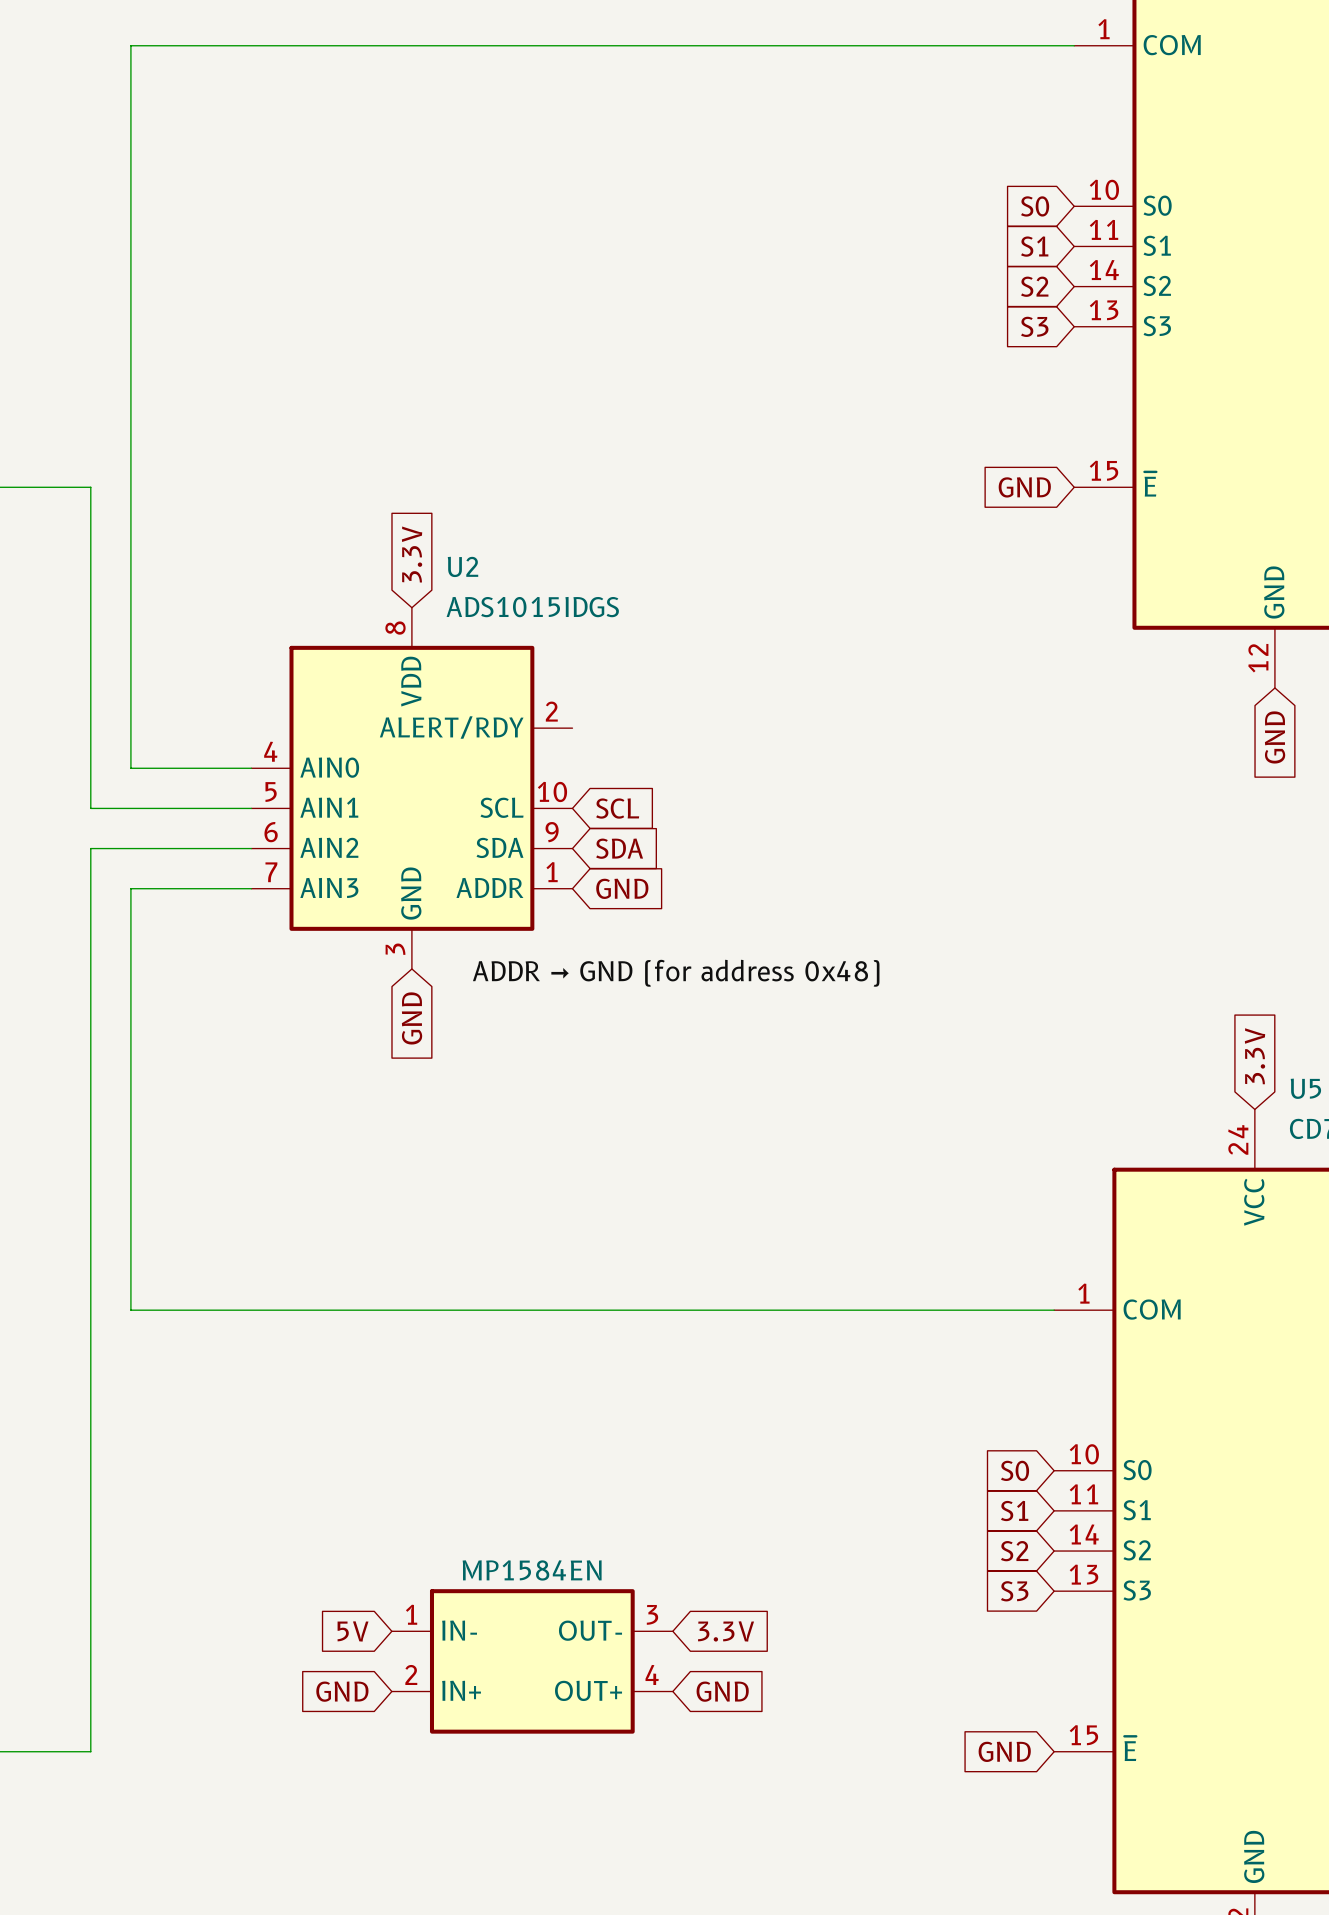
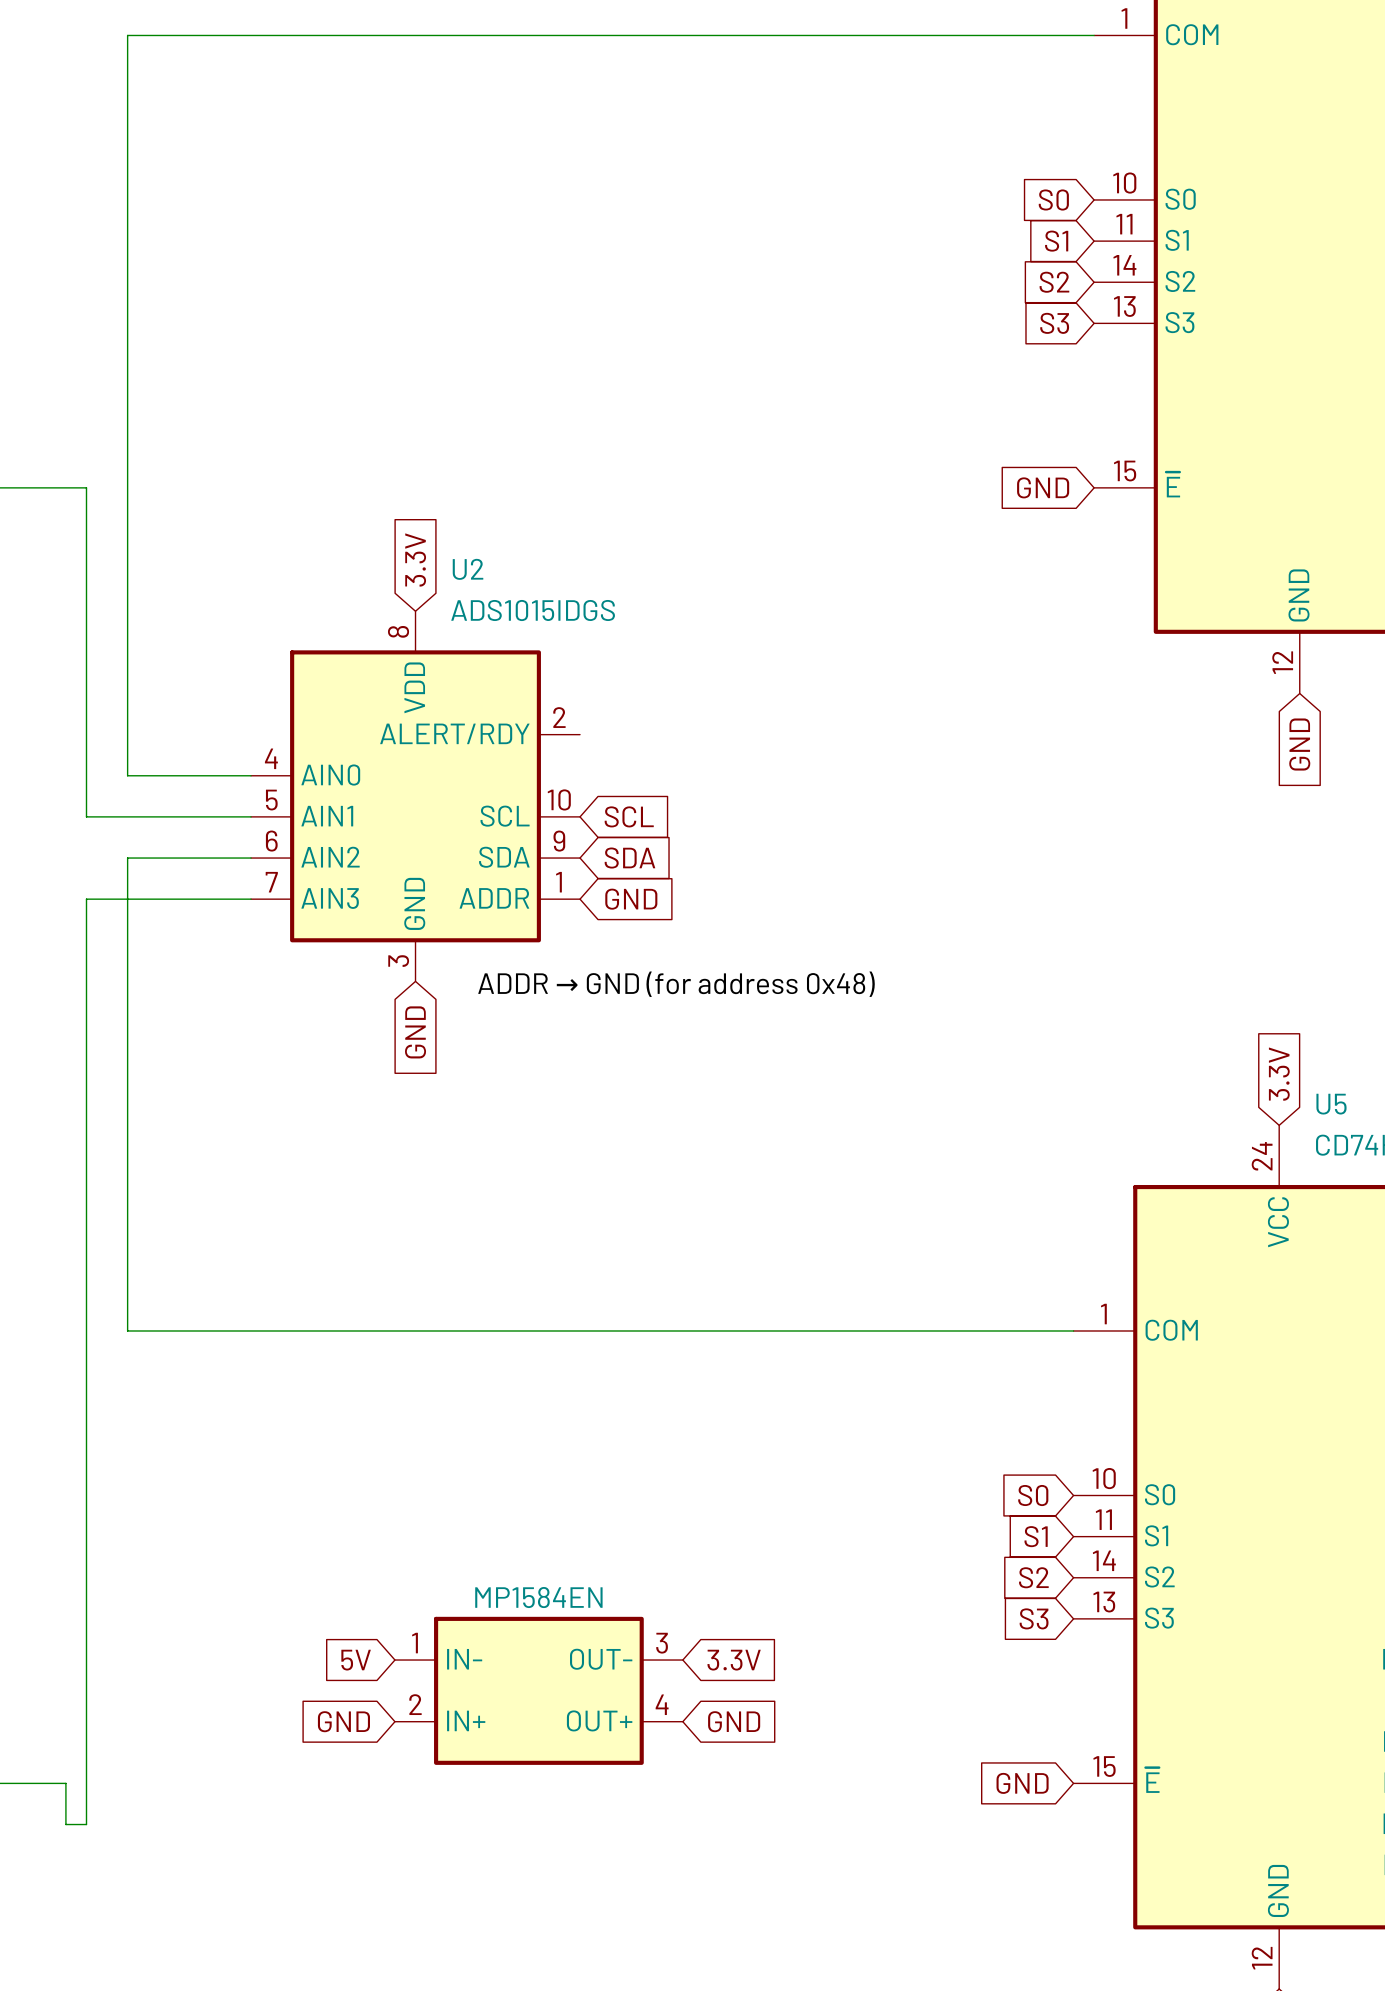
wire: (130, 848) (90, 848) (90, 888) -> (127, 858) (127, 899) (86, 899)
wire: (70, 1751) (90, 1751) -> (65, 1783) (65, 1824) (86, 1824) (86, 1783)

